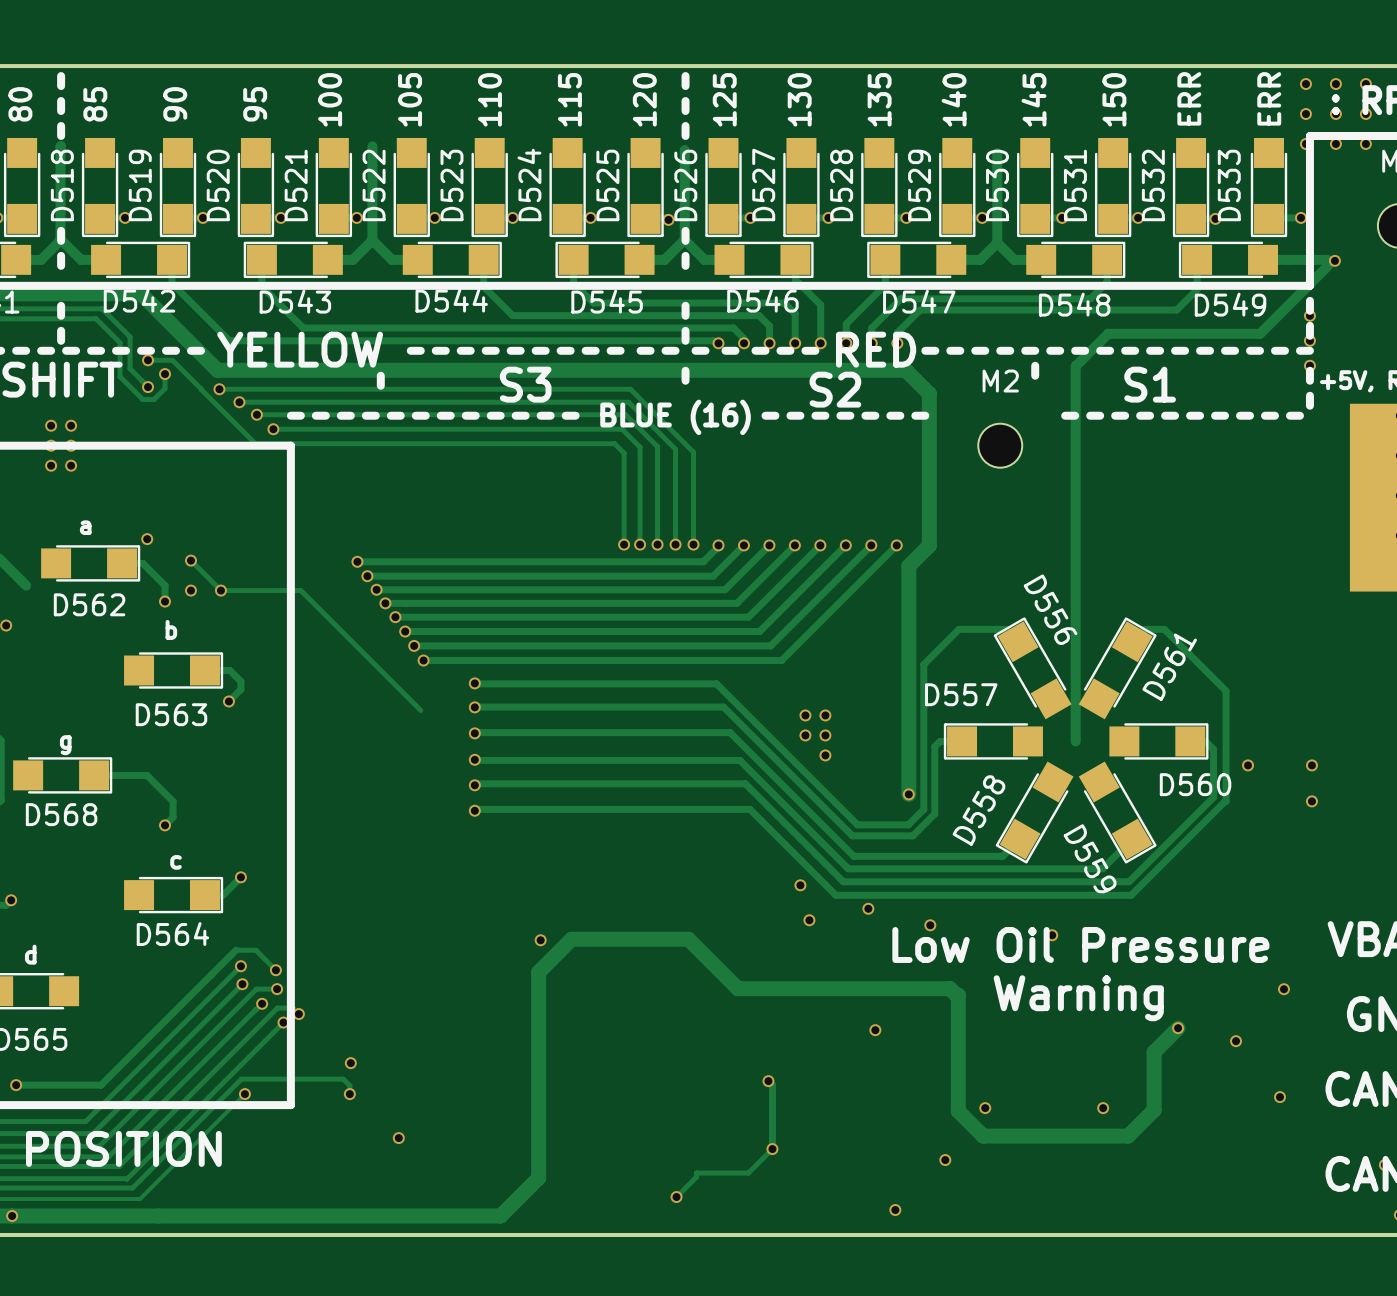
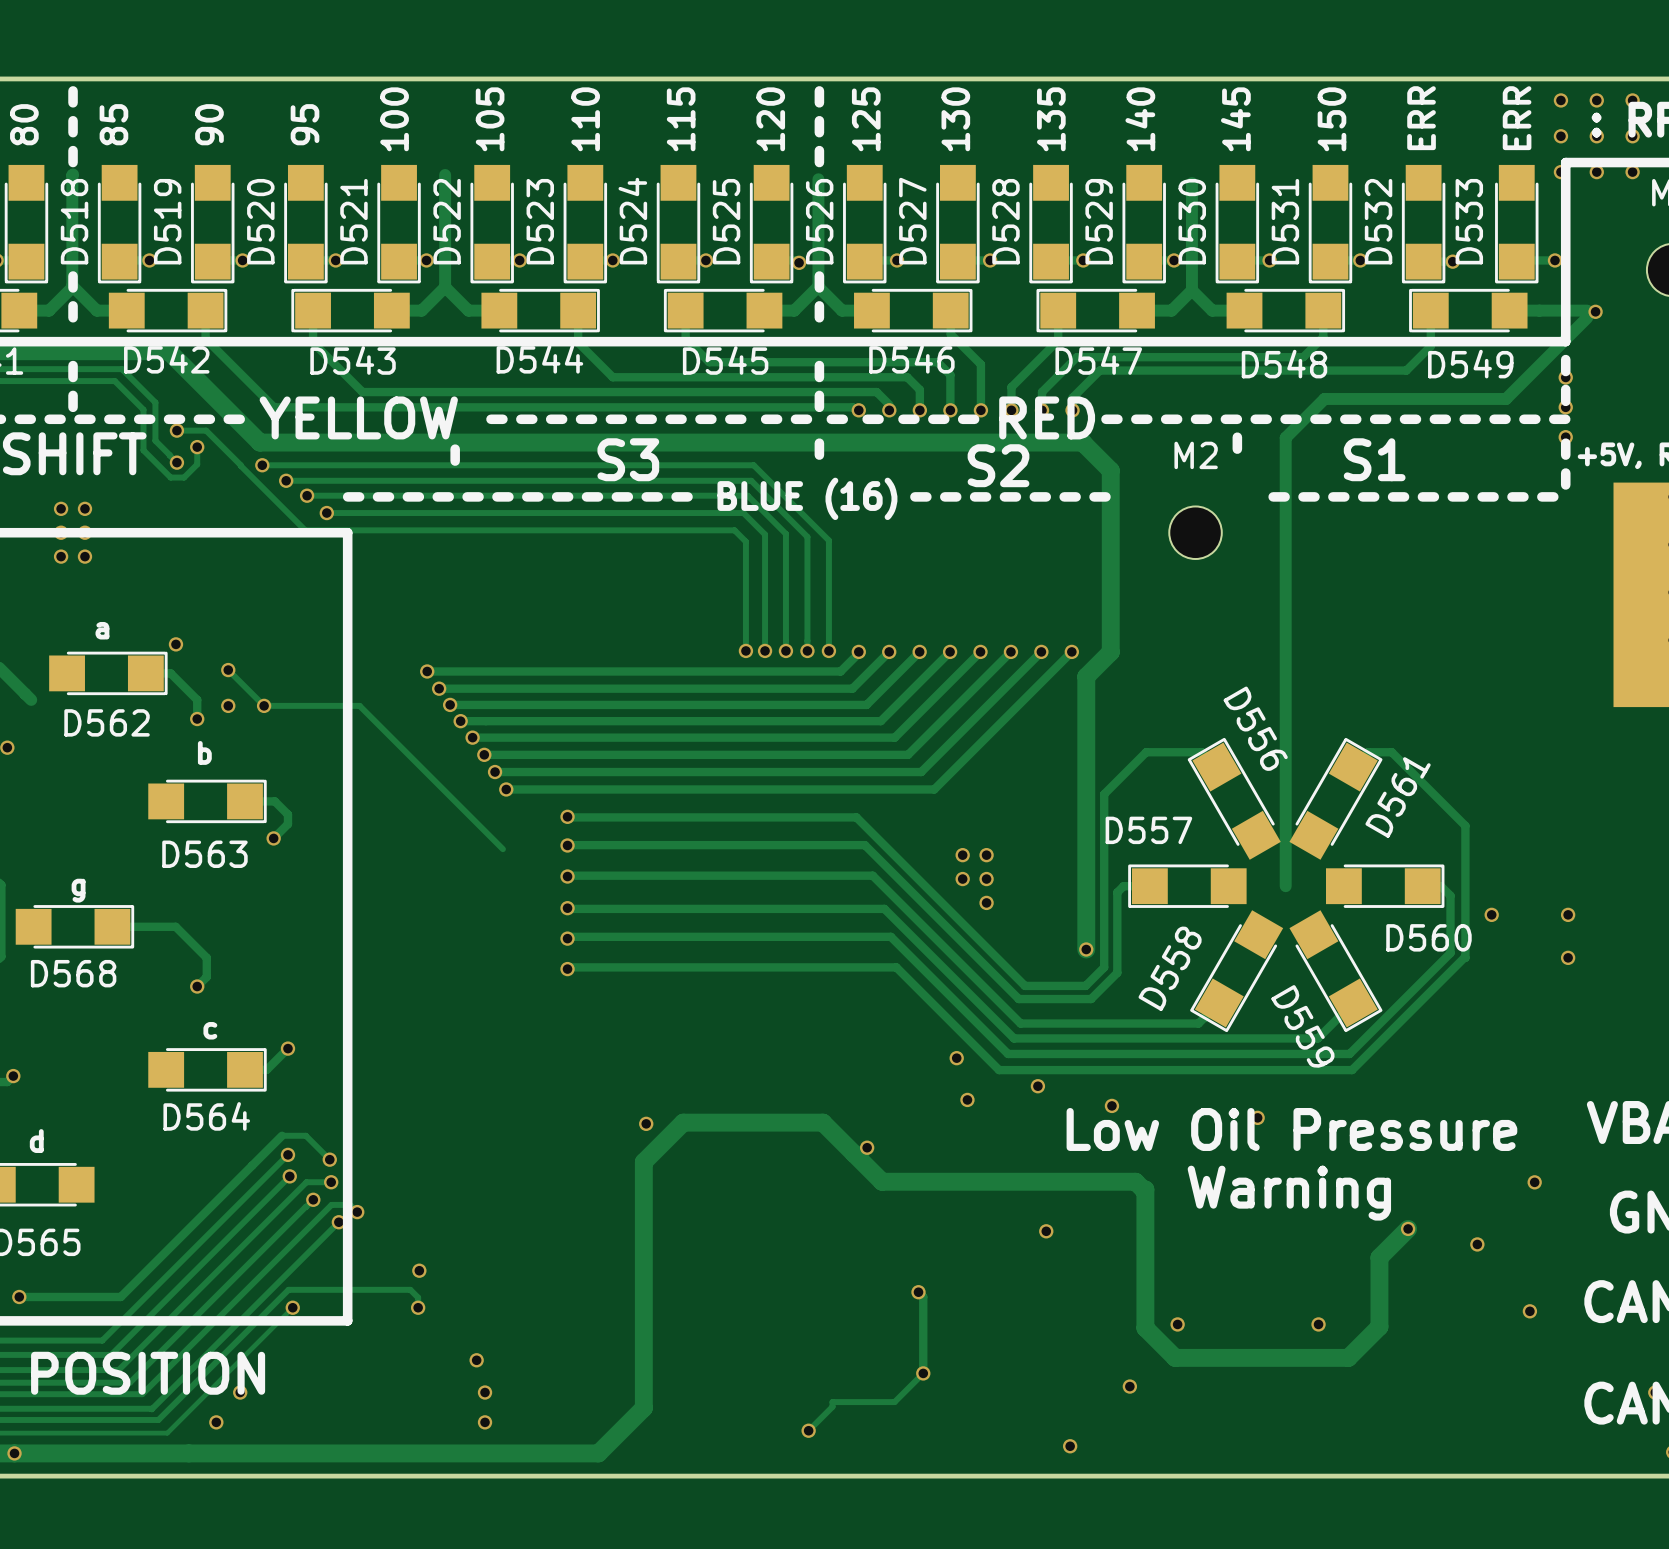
via: none -> (867, 1147)
via: none -> (240, 1392)
via: none -> (485, 1392)
via: none -> (216, 1422)
via: none -> (485, 1422)

